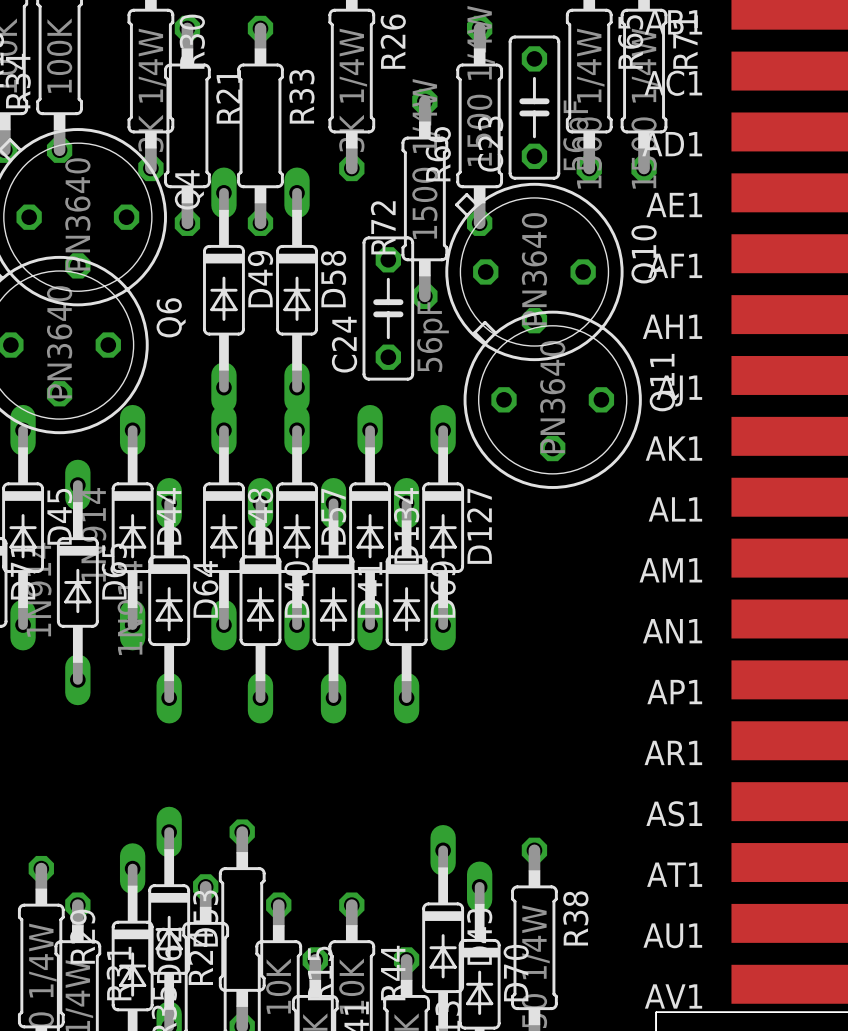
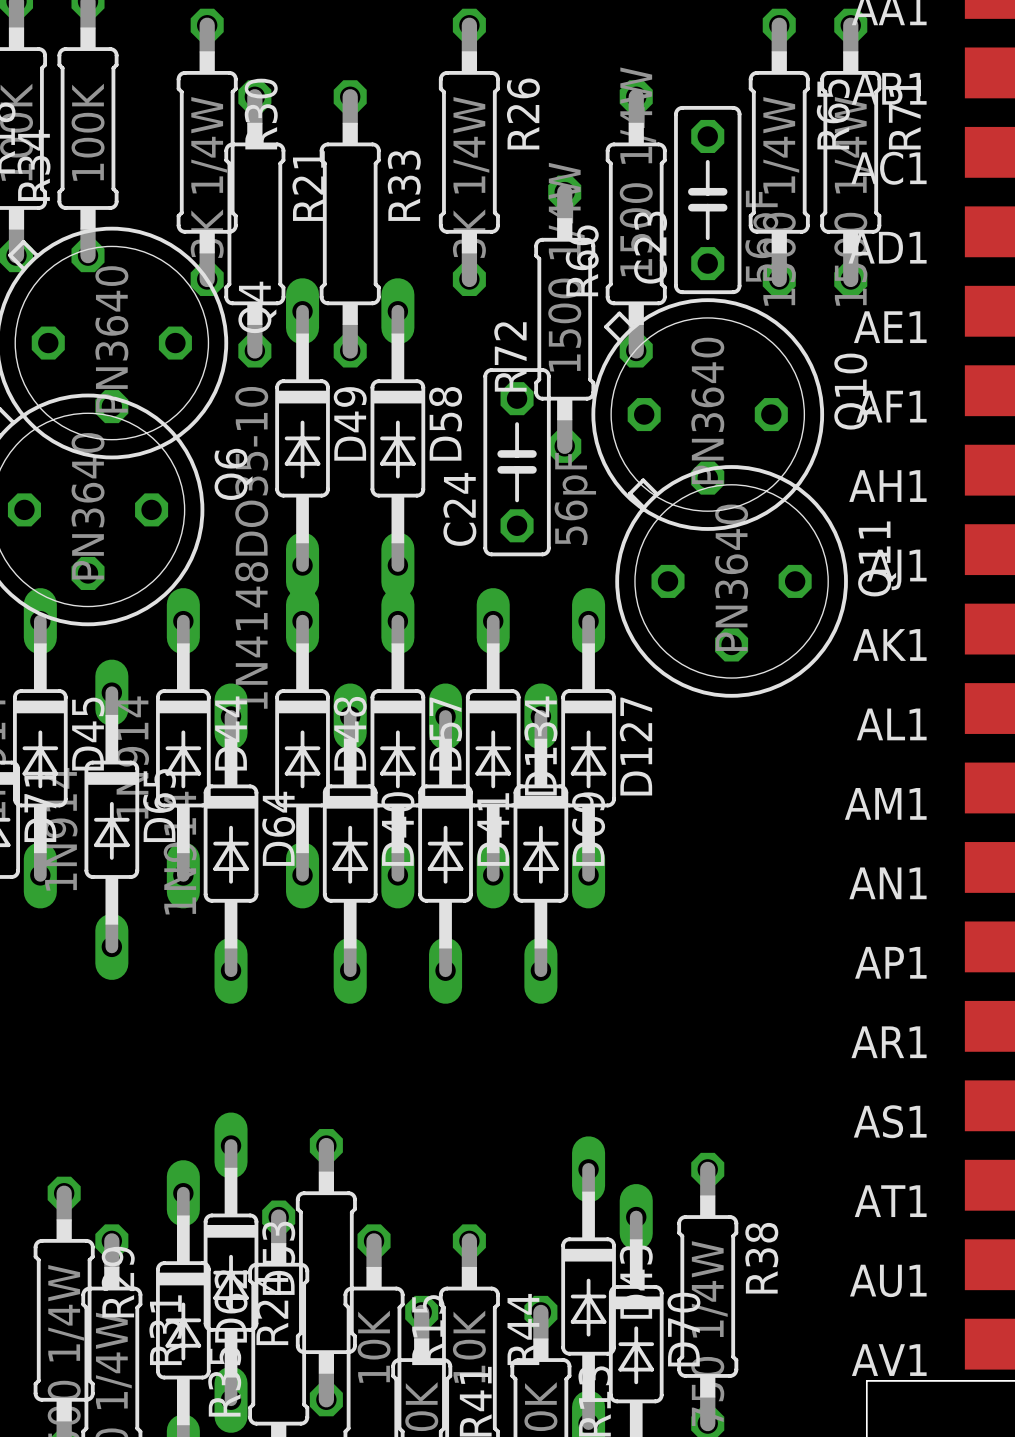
D49 value: none -> 1N4148DO35-10 (251, 548)

